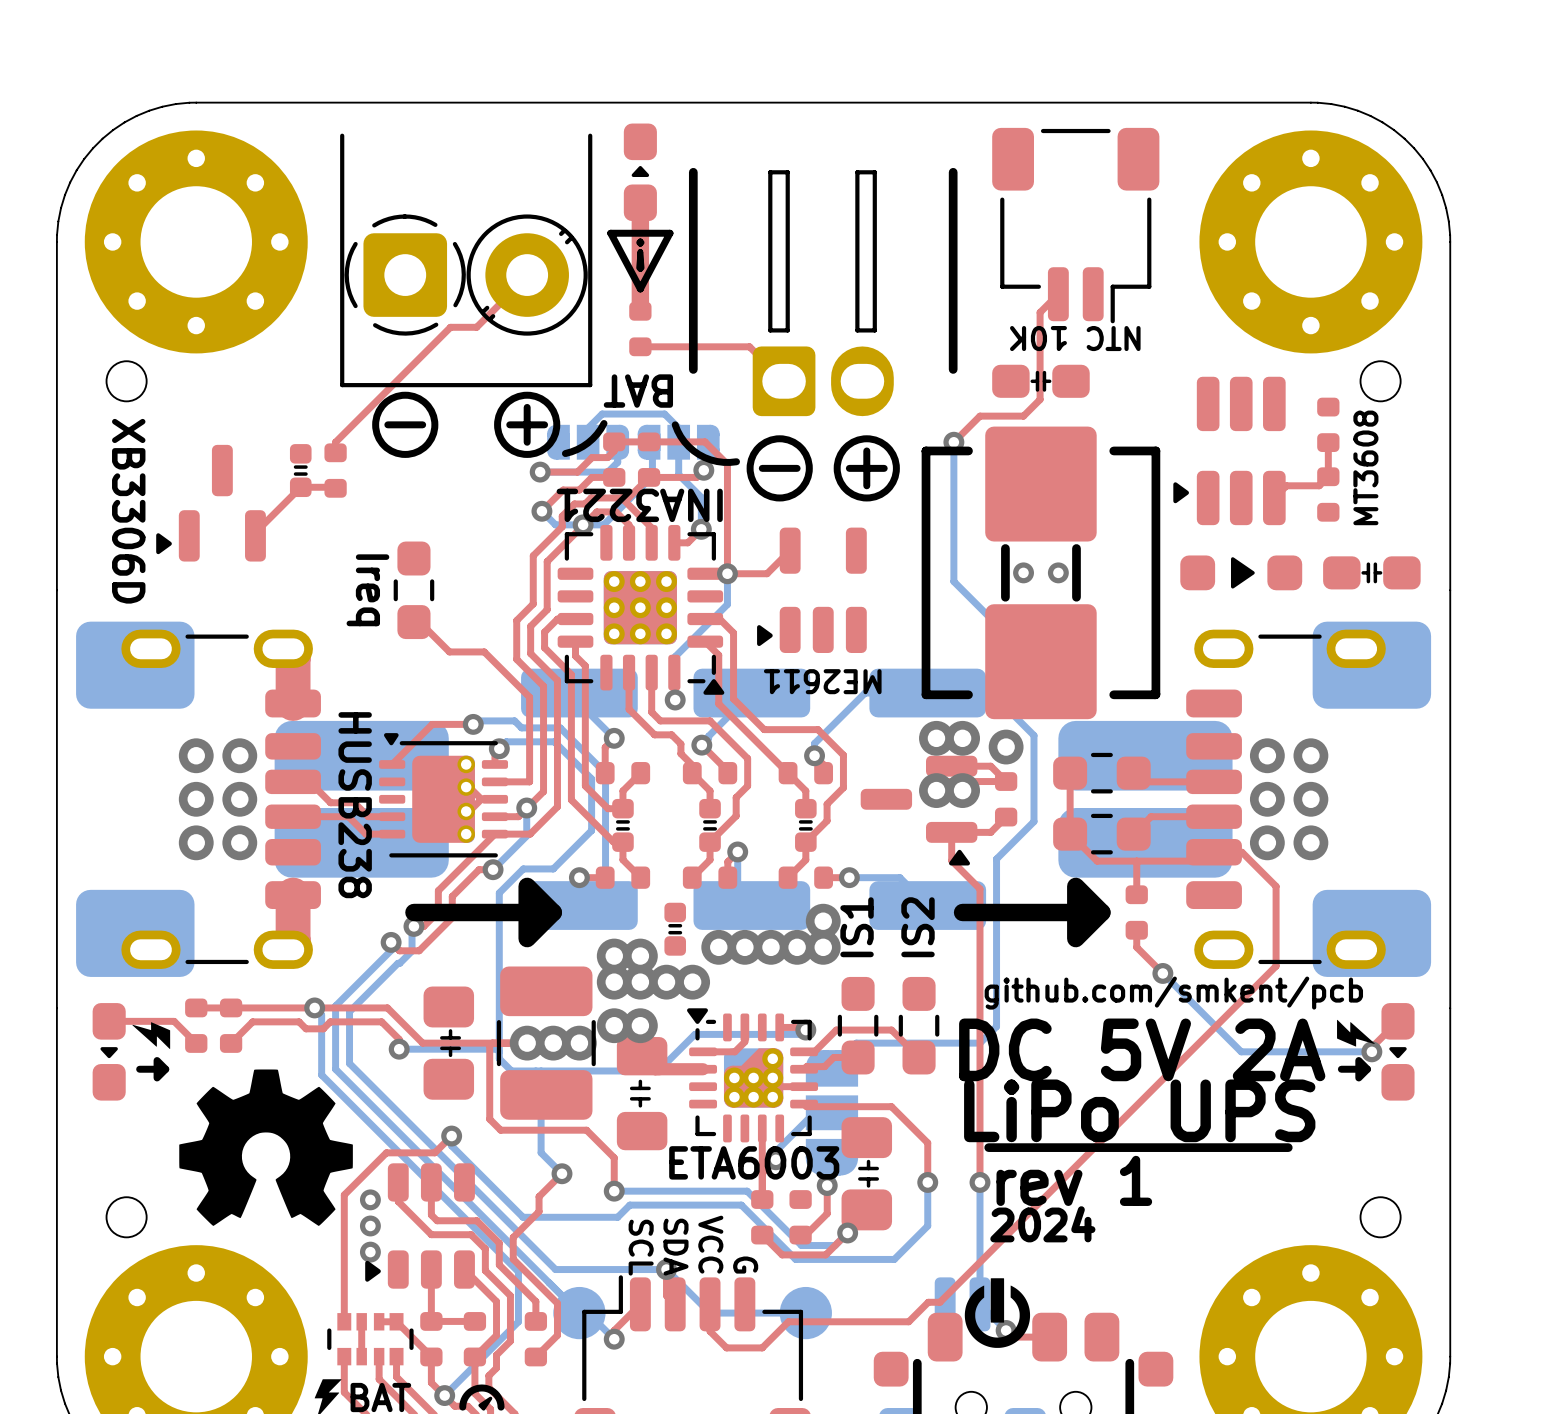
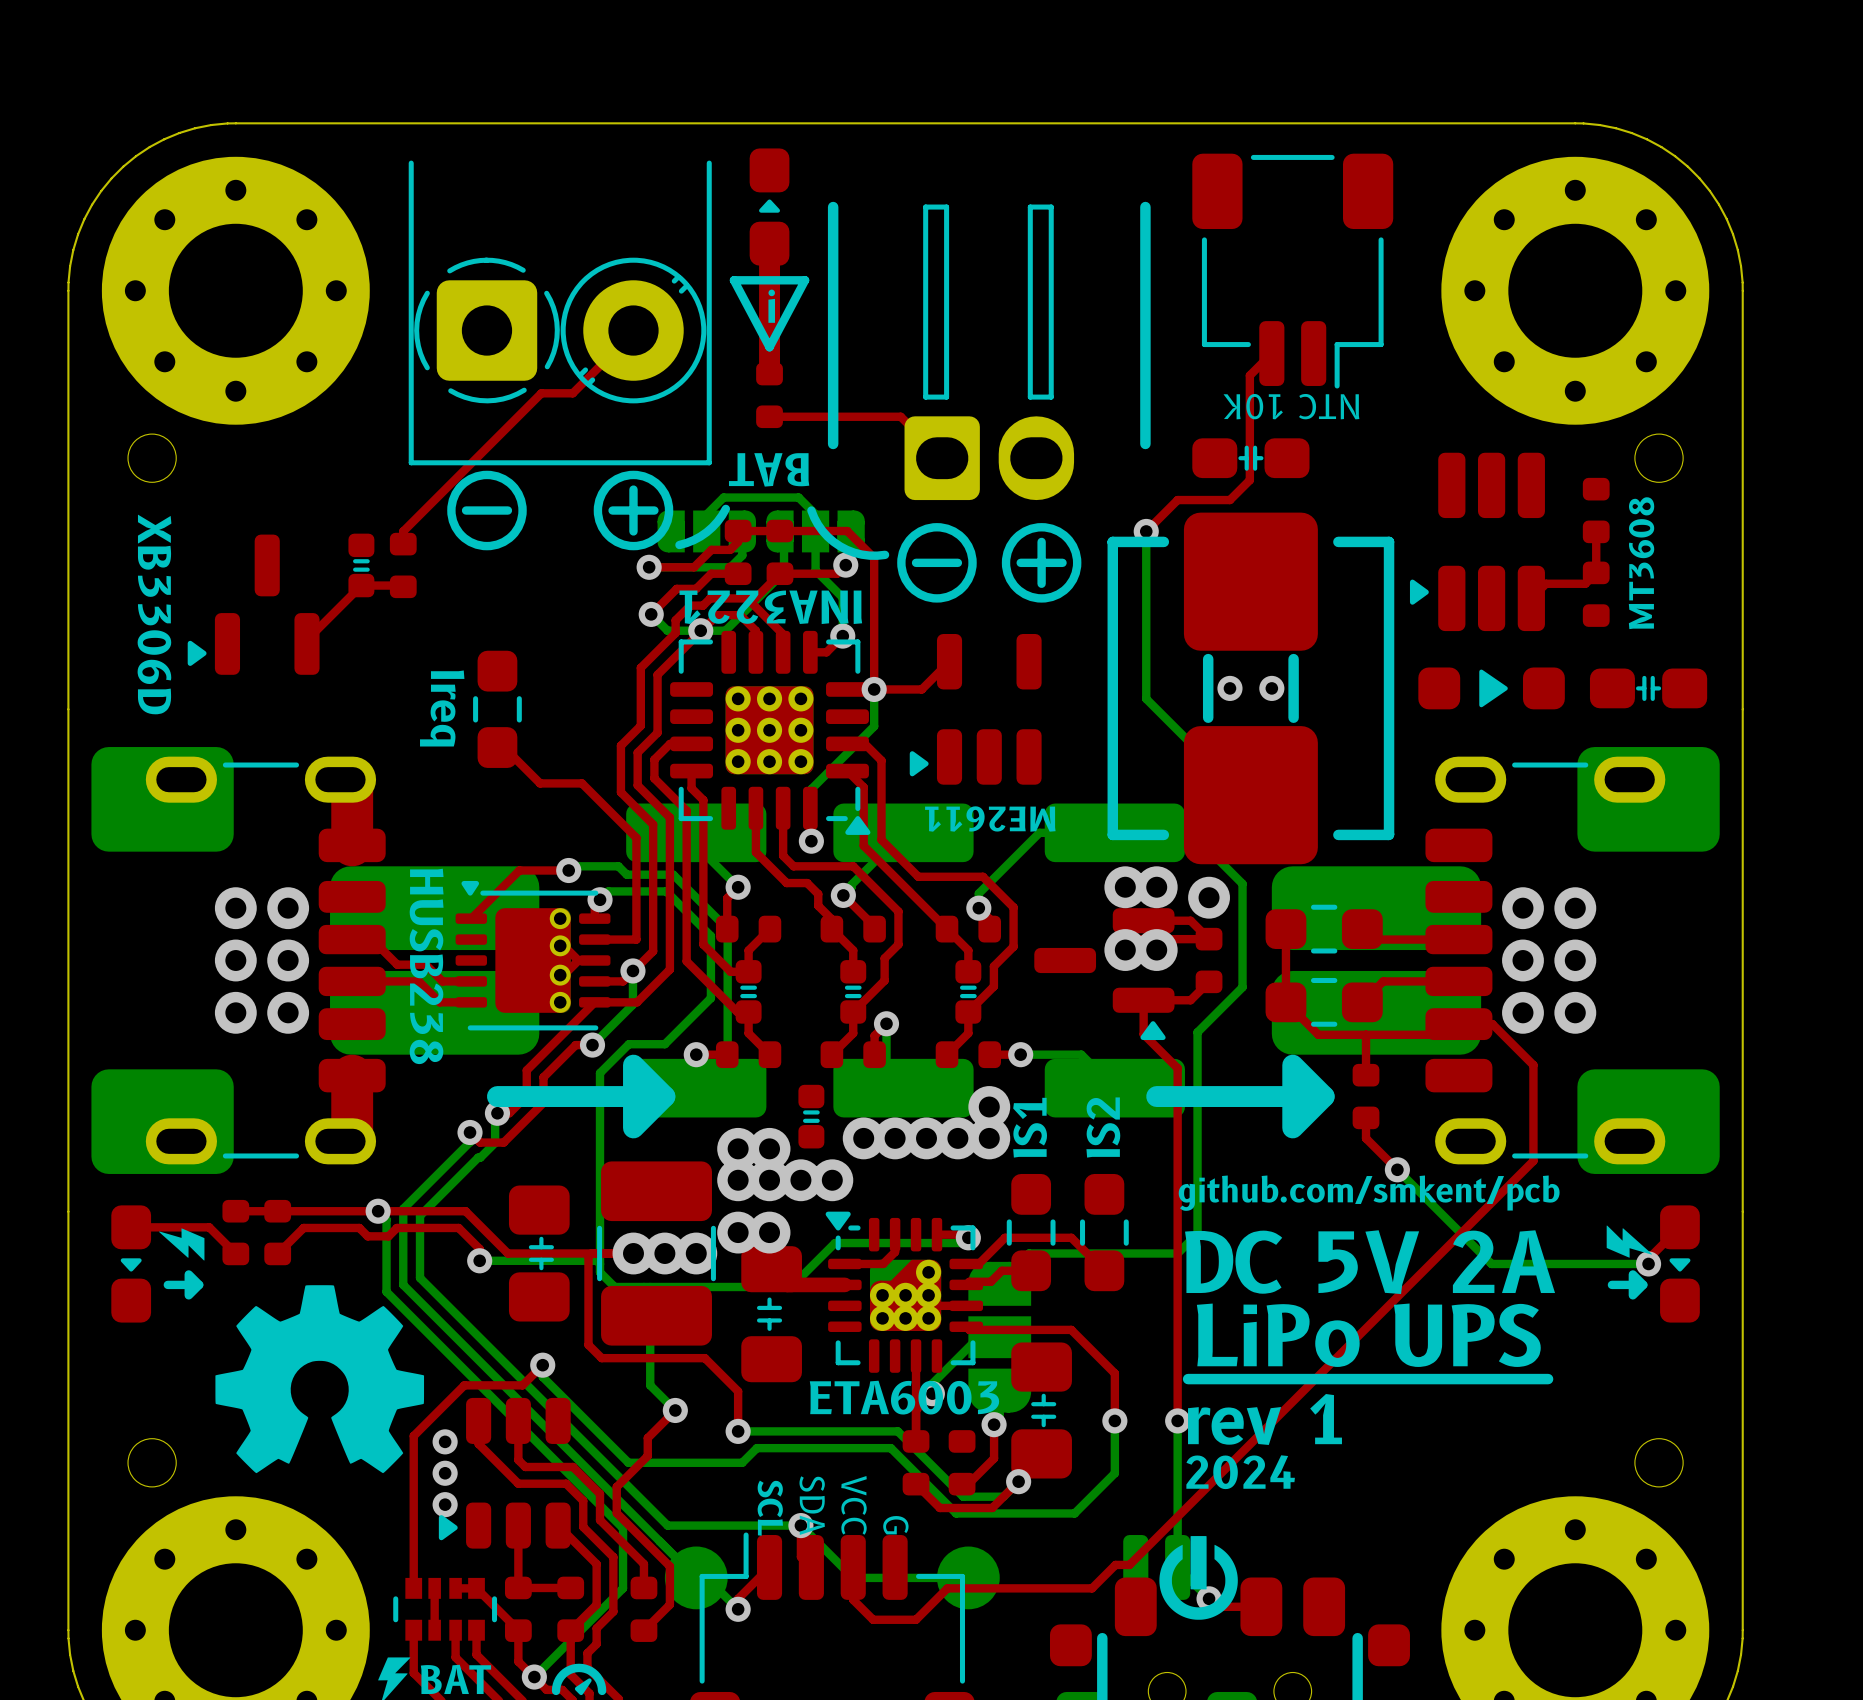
part footprint: [921, 426, 1161, 720] -> [1107, 512, 1395, 865]

